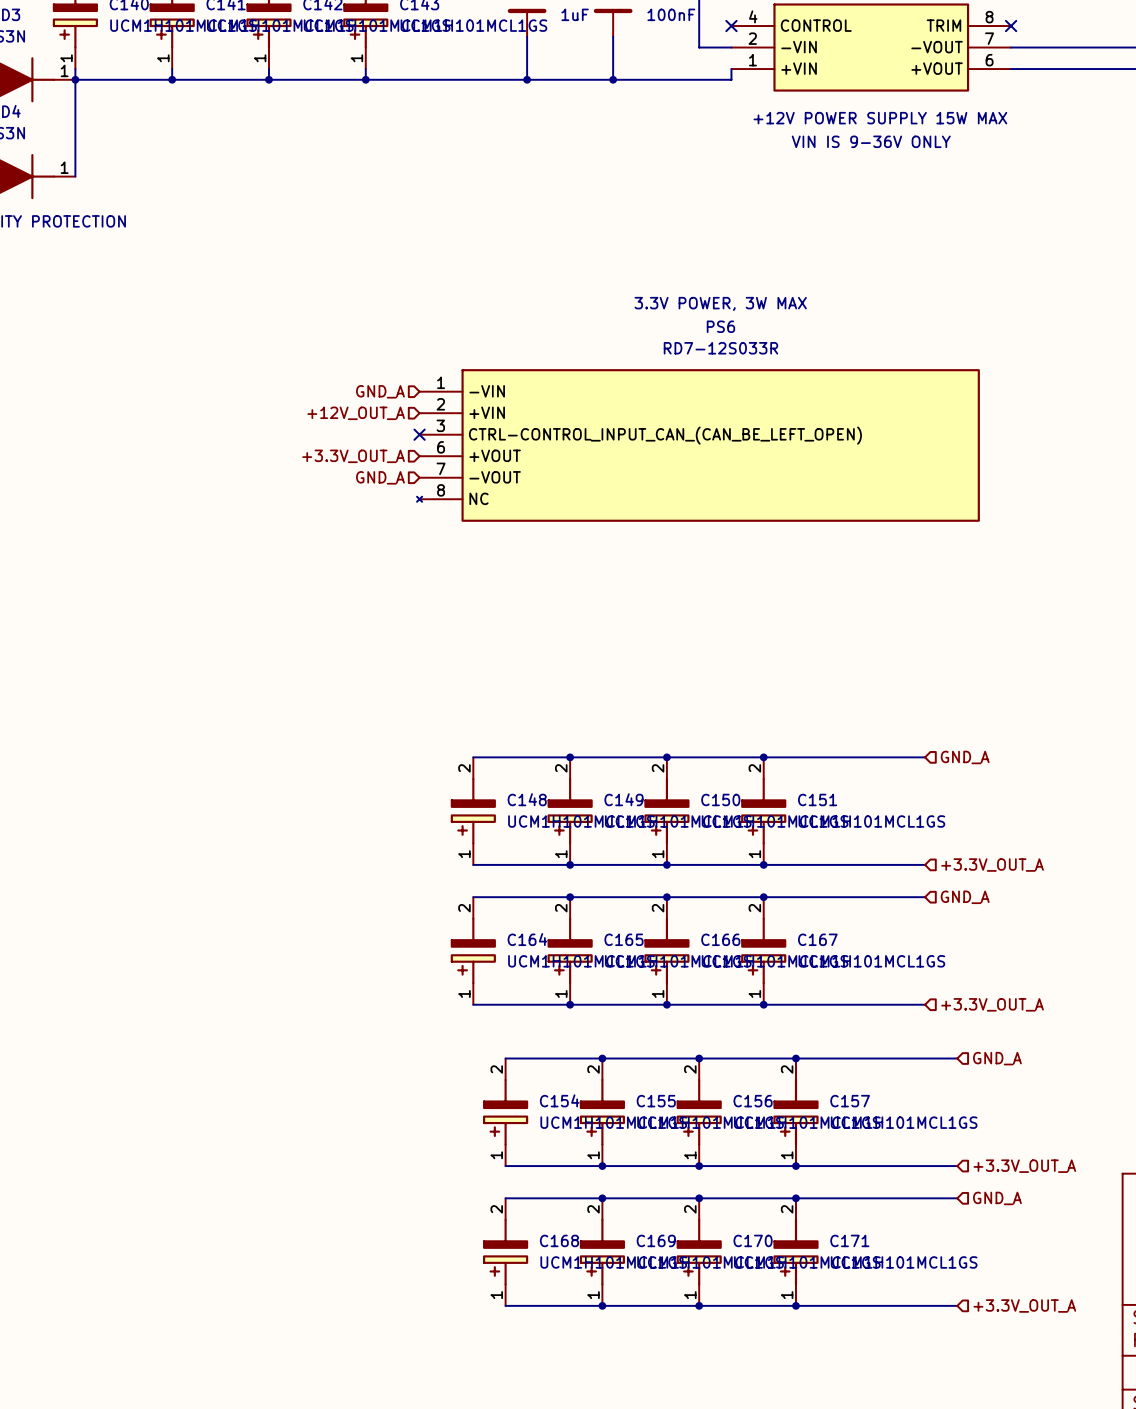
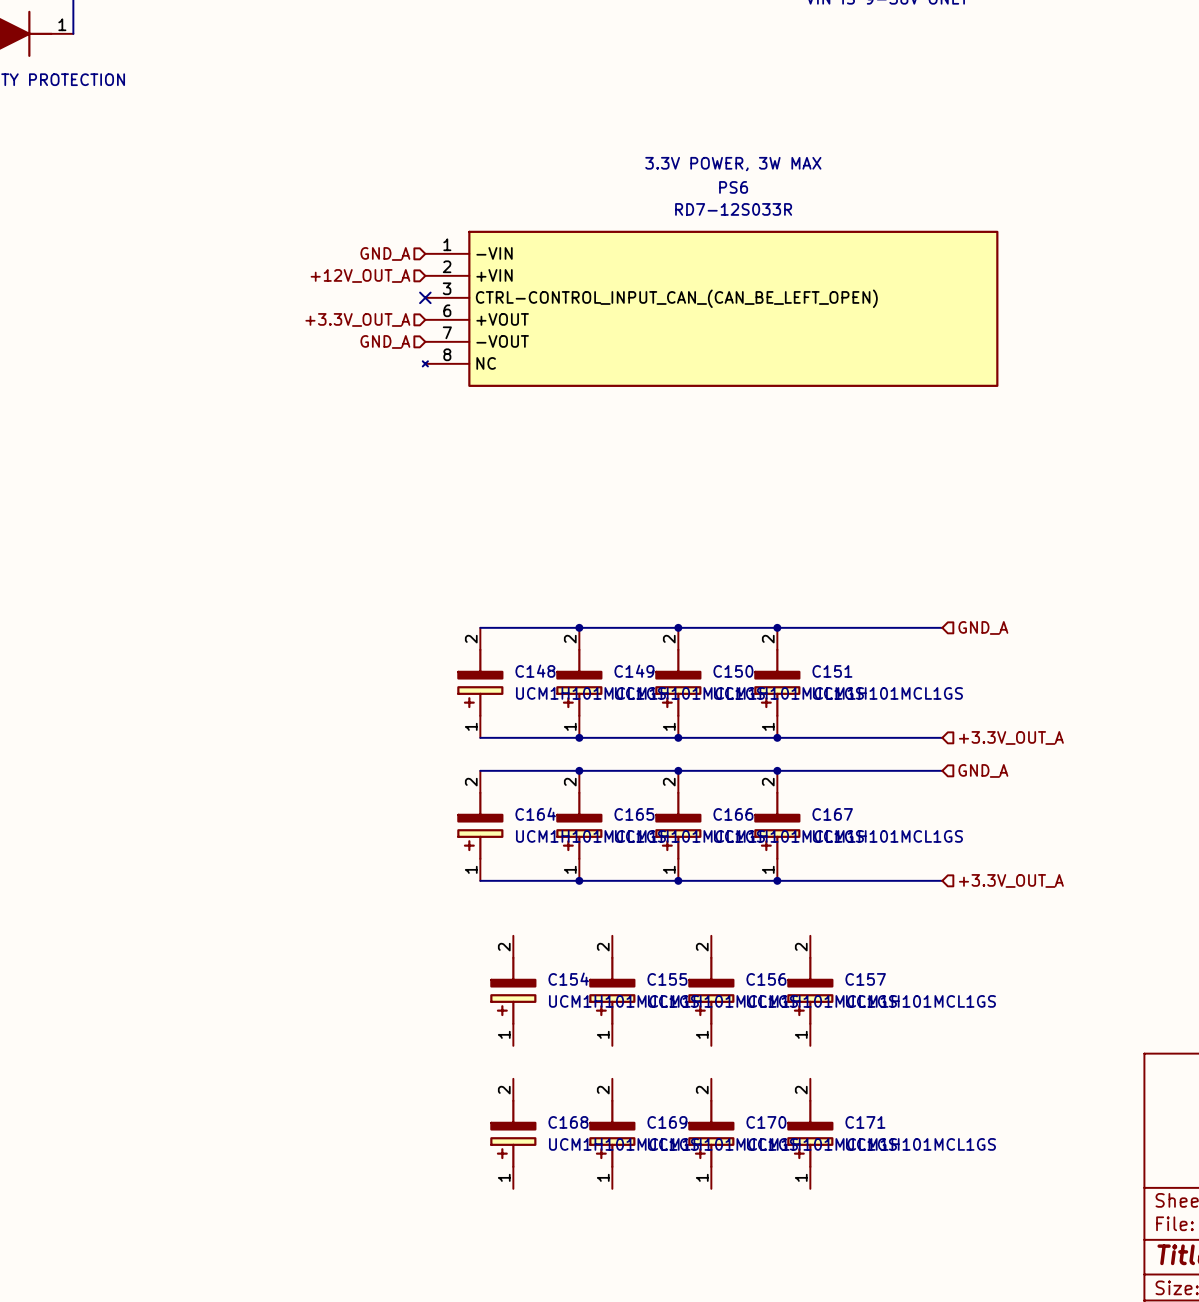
wire: (505, 1058) (957, 1058) -> none
junction: (602, 1058) -> none
junction: (699, 1058) -> none
junction: (795, 1058) -> none
hierarchical label: GND_A (997, 1058) -> none
wire: (505, 1166) (957, 1166) -> none
junction: (602, 1166) -> none
junction: (699, 1166) -> none
junction: (795, 1166) -> none
hierarchical label: +3.3V_OUT_A (1024, 1166) -> none
wire: (505, 1198) (957, 1198) -> none
junction: (602, 1198) -> none
junction: (699, 1198) -> none
junction: (795, 1198) -> none
hierarchical label: GND_A (997, 1198) -> none
wire: (505, 1305) (957, 1305) -> none
junction: (602, 1305) -> none
junction: (699, 1305) -> none
junction: (795, 1305) -> none
hierarchical label: +3.3V_OUT_A (1024, 1305) -> none

